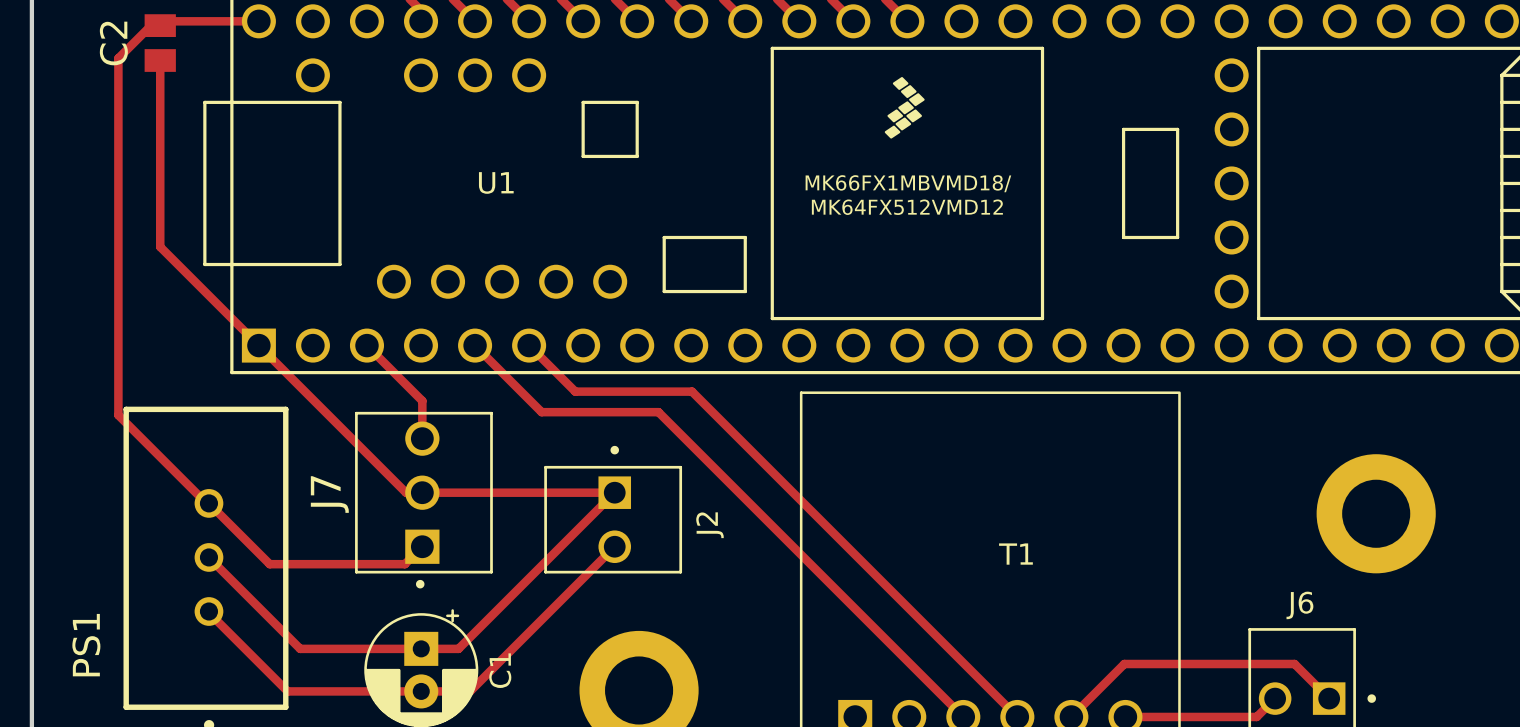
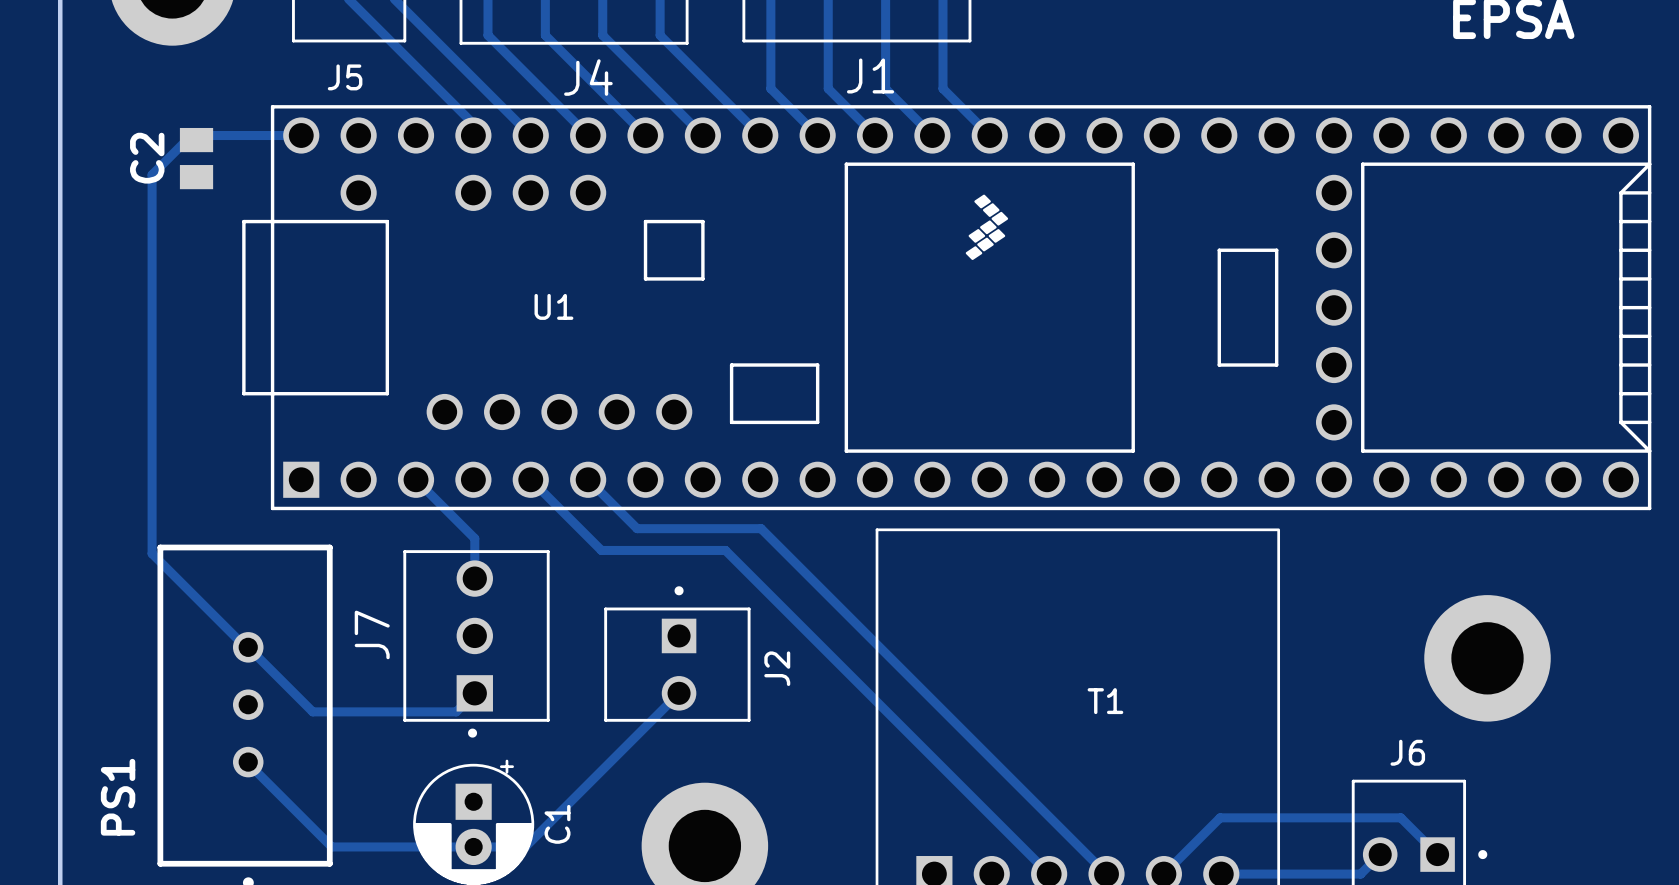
track: (160, 60) (160, 246) (406, 492) (614, 492) (458, 648) (300, 648) (208, 557) -> none
U1 text: MK66FX1MBVMD18/ (908, 183) -> none
U1 text: MK64FX512VMD12 (907, 207) -> none

